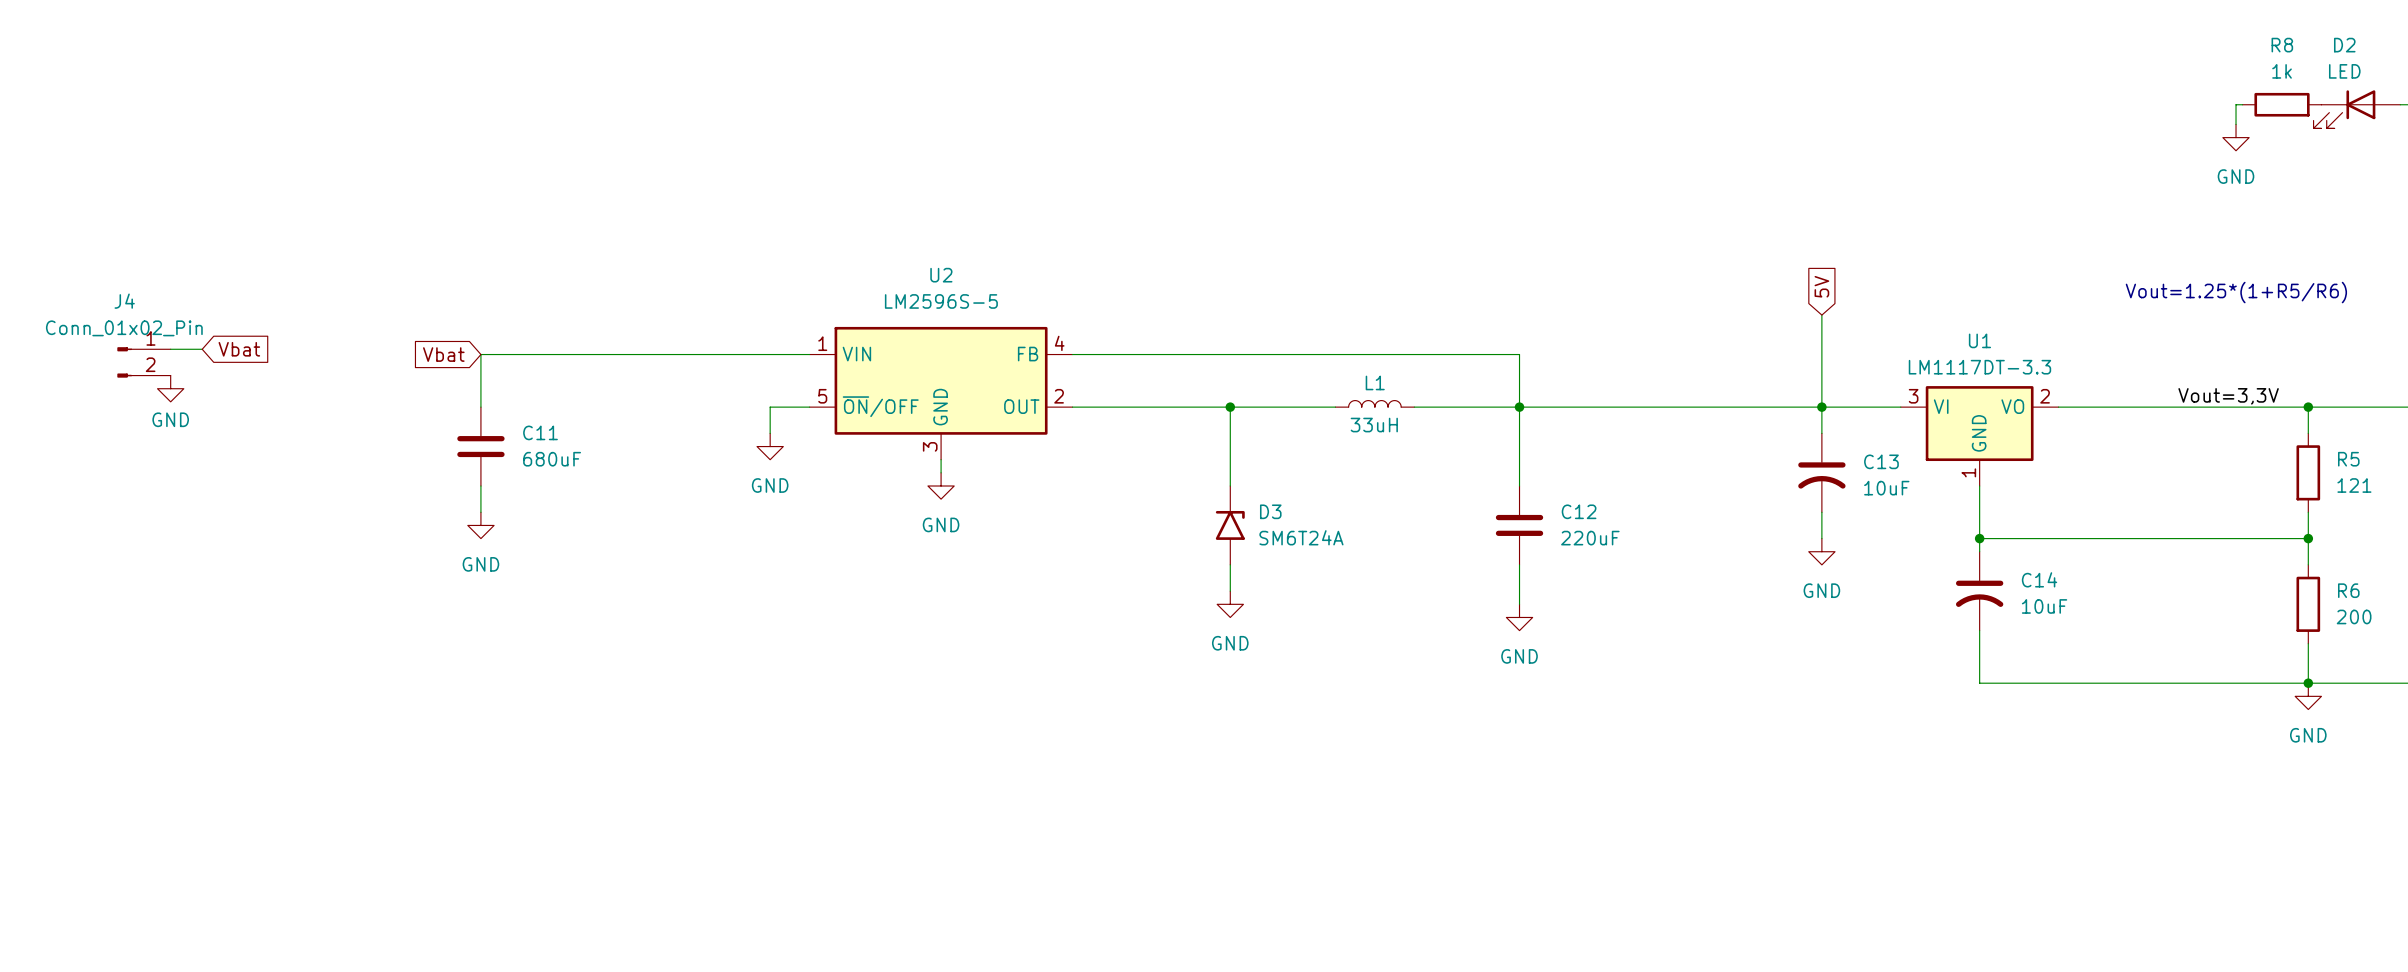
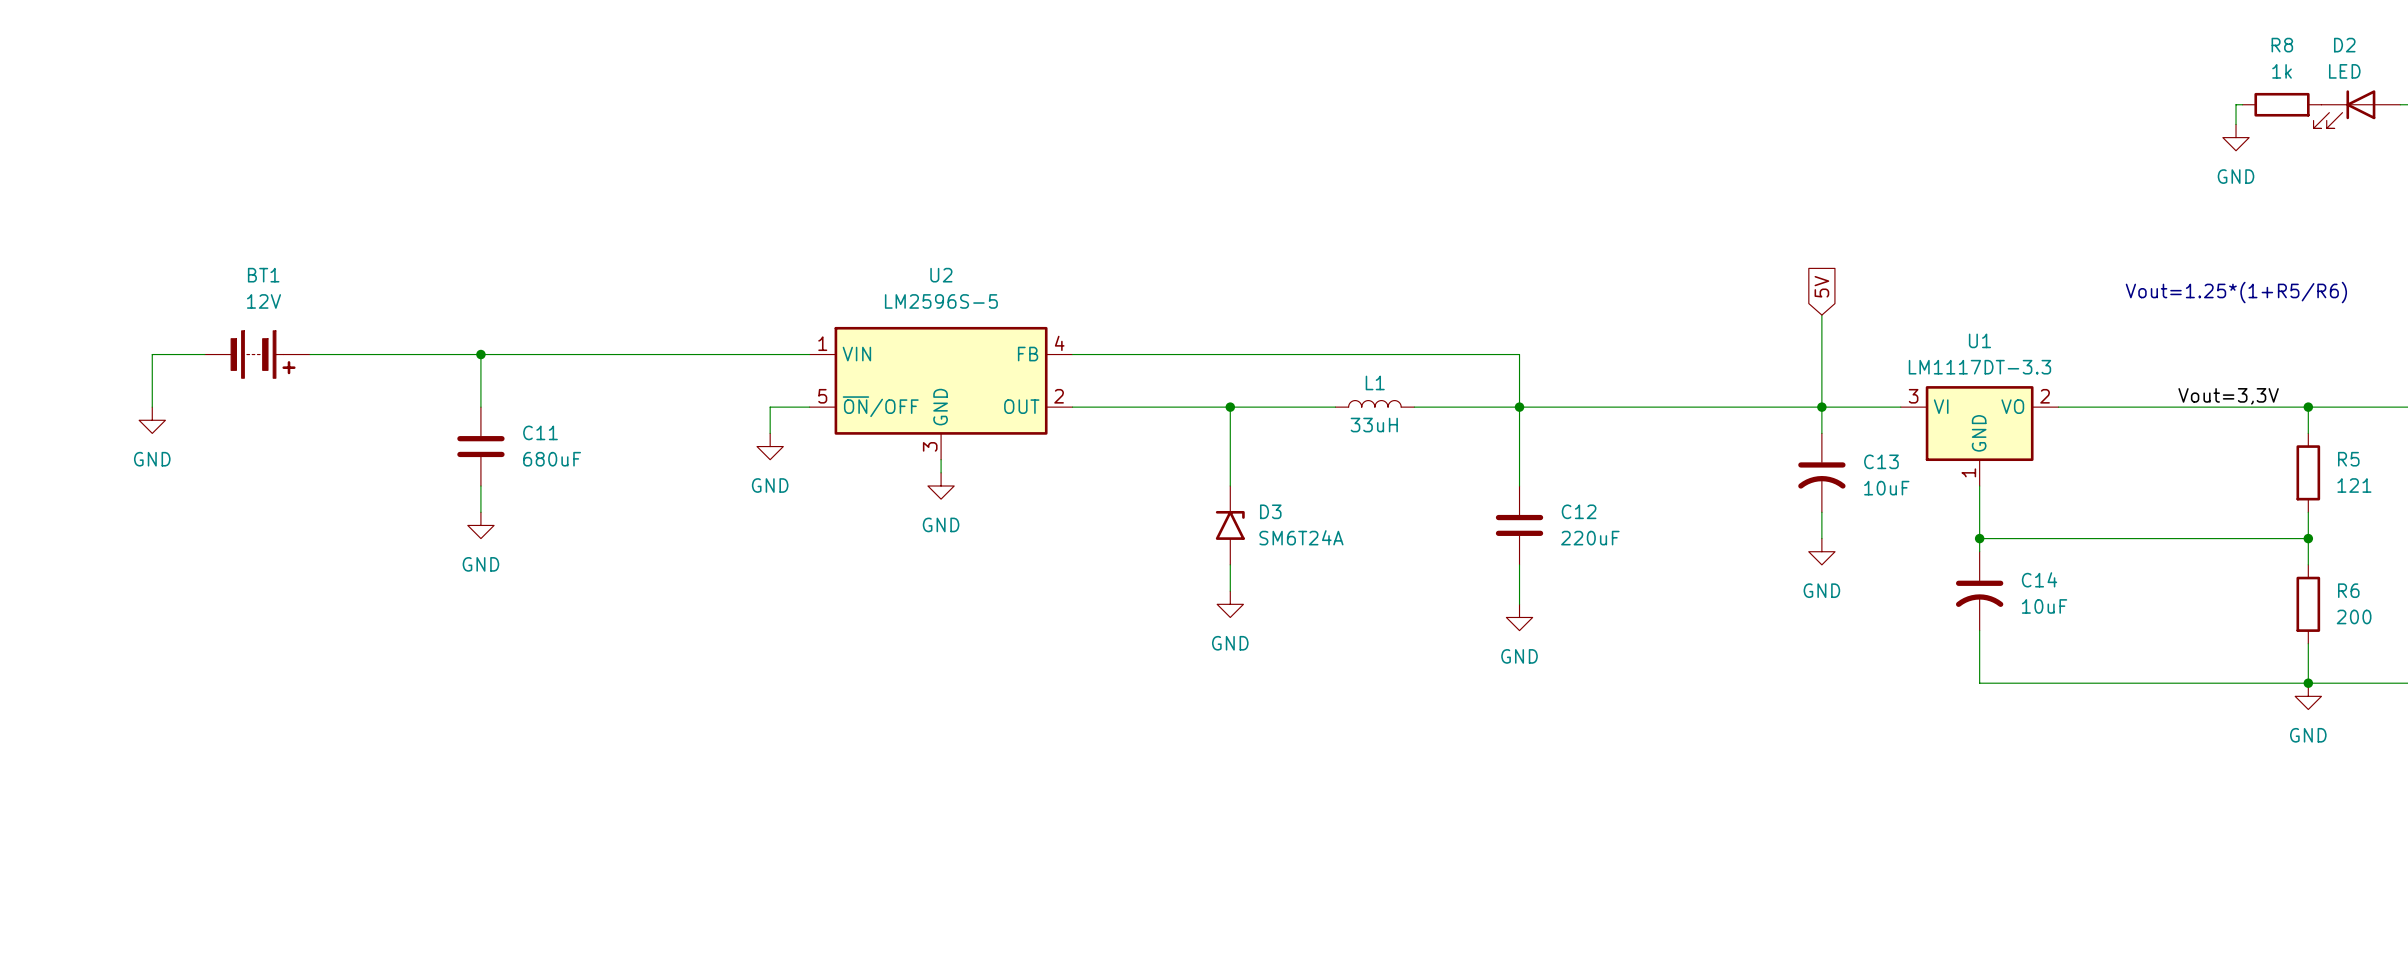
wire: (170, 349) (202, 349) -> none
global label: Vbat (239, 349) -> none
wire: none -> (204, 354) (152, 354) (152, 407)
BT1: none -> 12V (257, 354)
wire: none -> (310, 354) (480, 354)
global label: Vbat (443, 354) -> none
junction: none -> (480, 354)
J4: Conn_01x02_Pin (143, 362) -> none
power symbol position: GND (170, 388) -> GND (152, 420)
power symbol text position: GND (170, 419) -> GND (152, 459)

